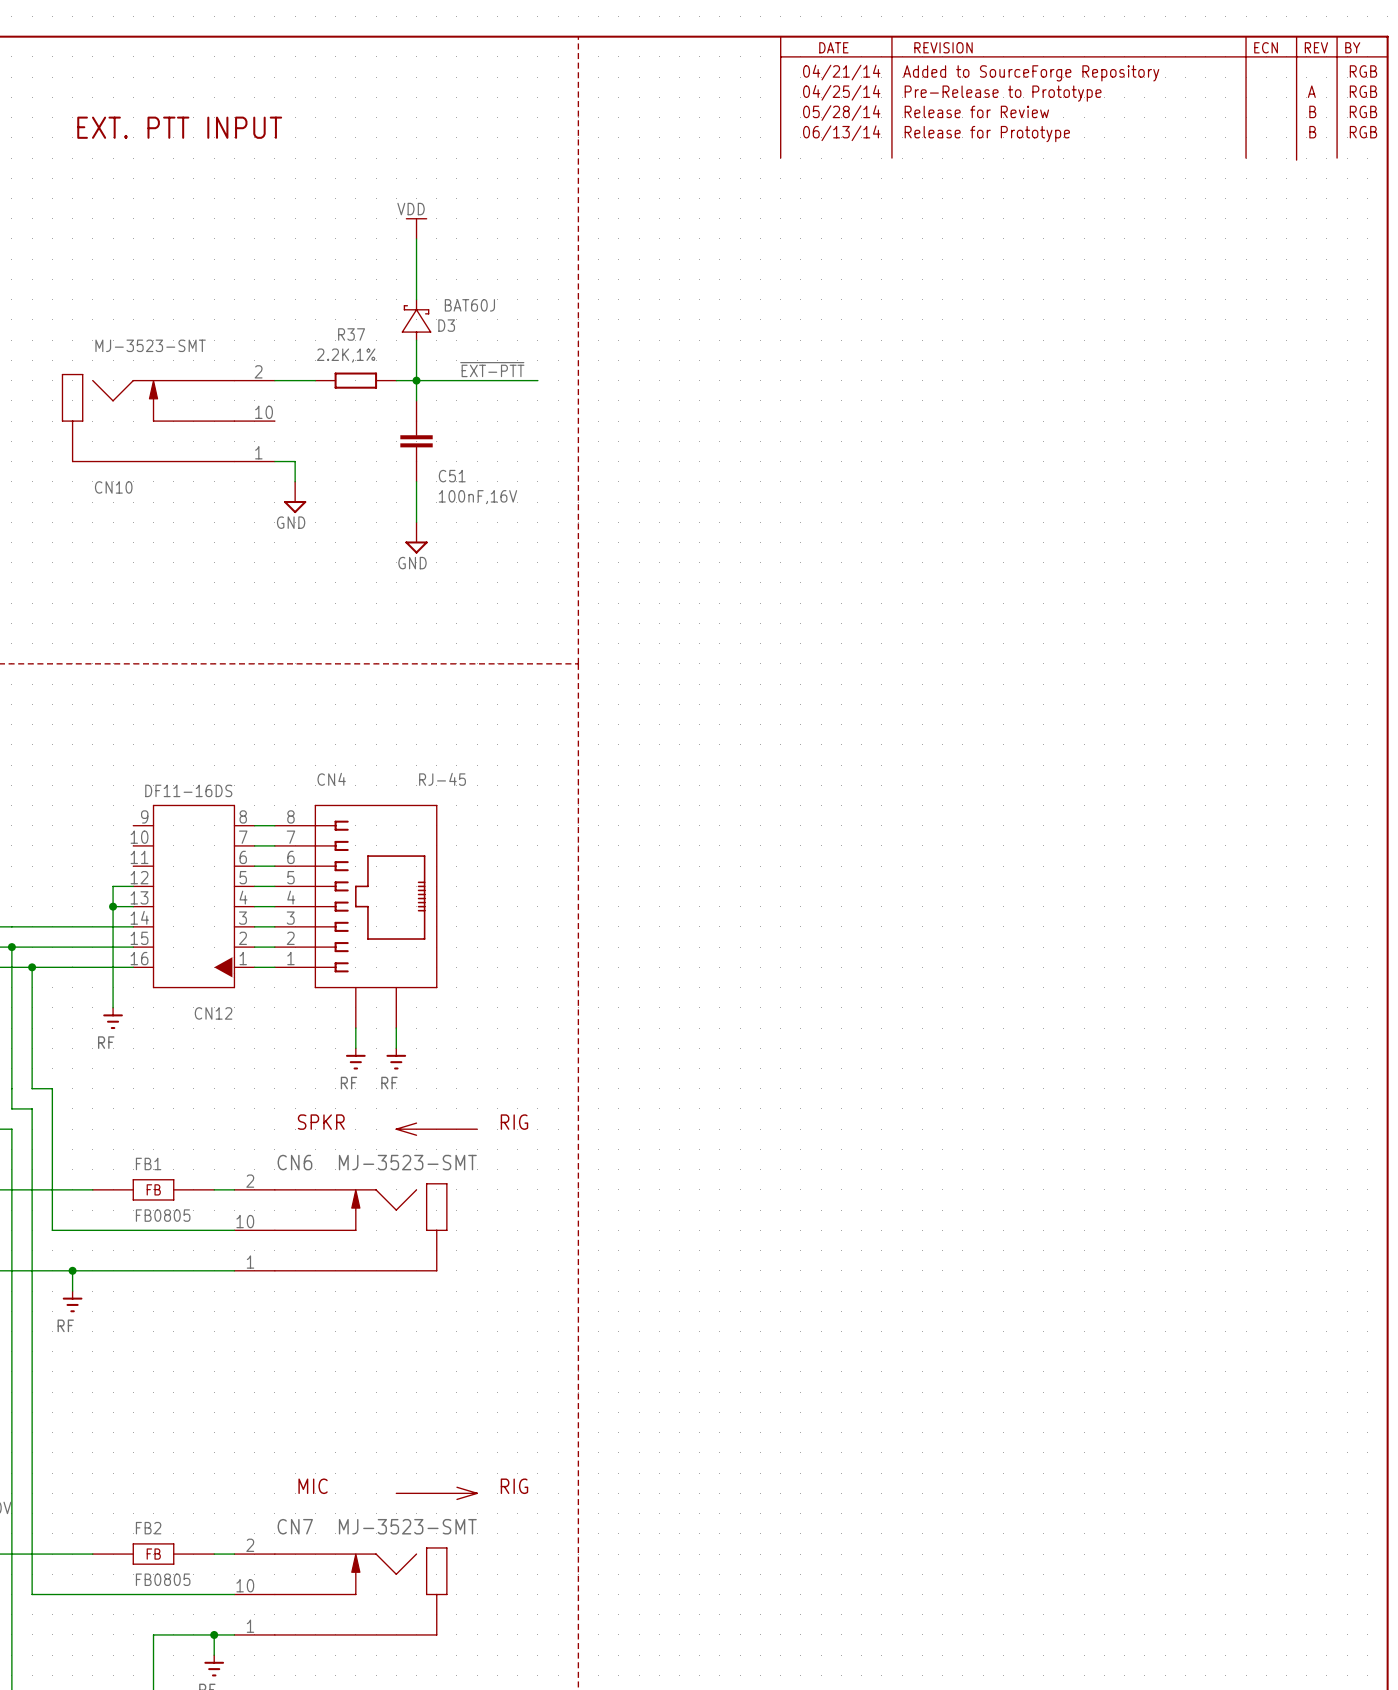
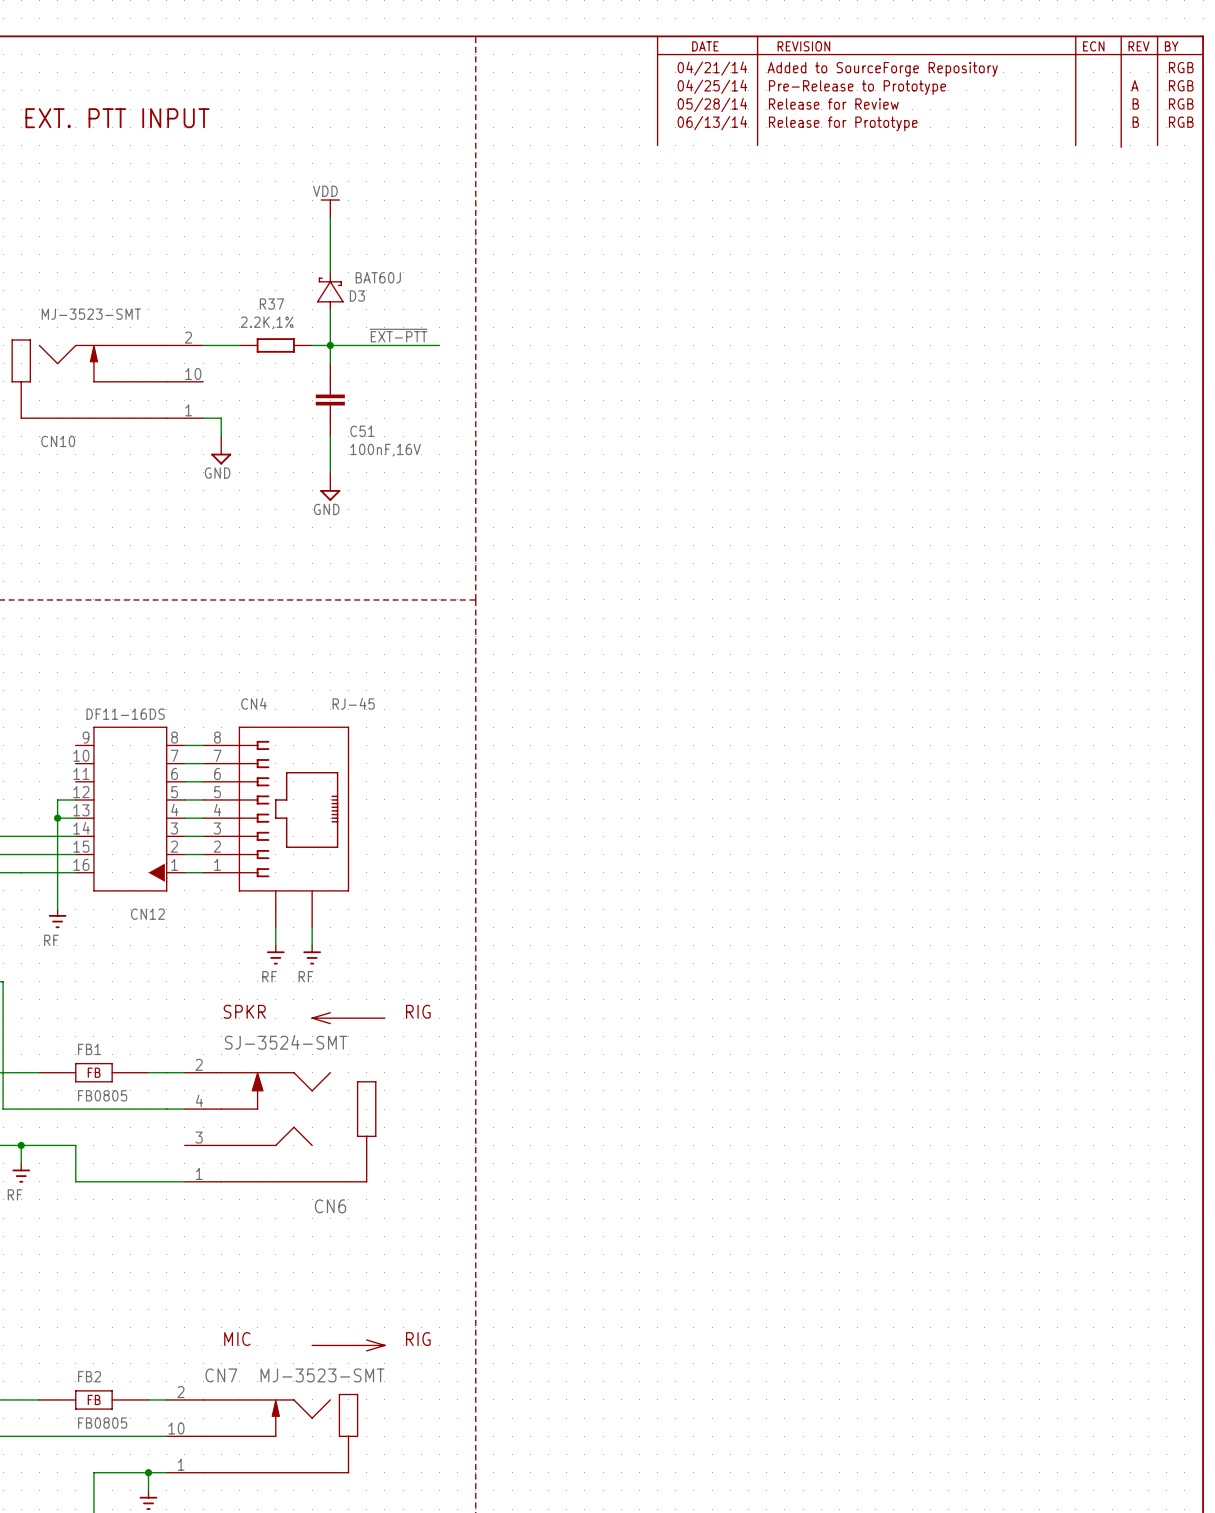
CN6 name position: CN6 (294, 1162) -> CN6 (330, 1206)
CN6 value: MJ-3523-SMT (407, 1162) -> SJ-3524-SMT (286, 1042)
CN6 symbol: [234, 1183, 448, 1272] -> [184, 1072, 377, 1183]
wire: (133, 1270) (234, 1270) -> (75, 1145) (75, 1181) (184, 1181)

